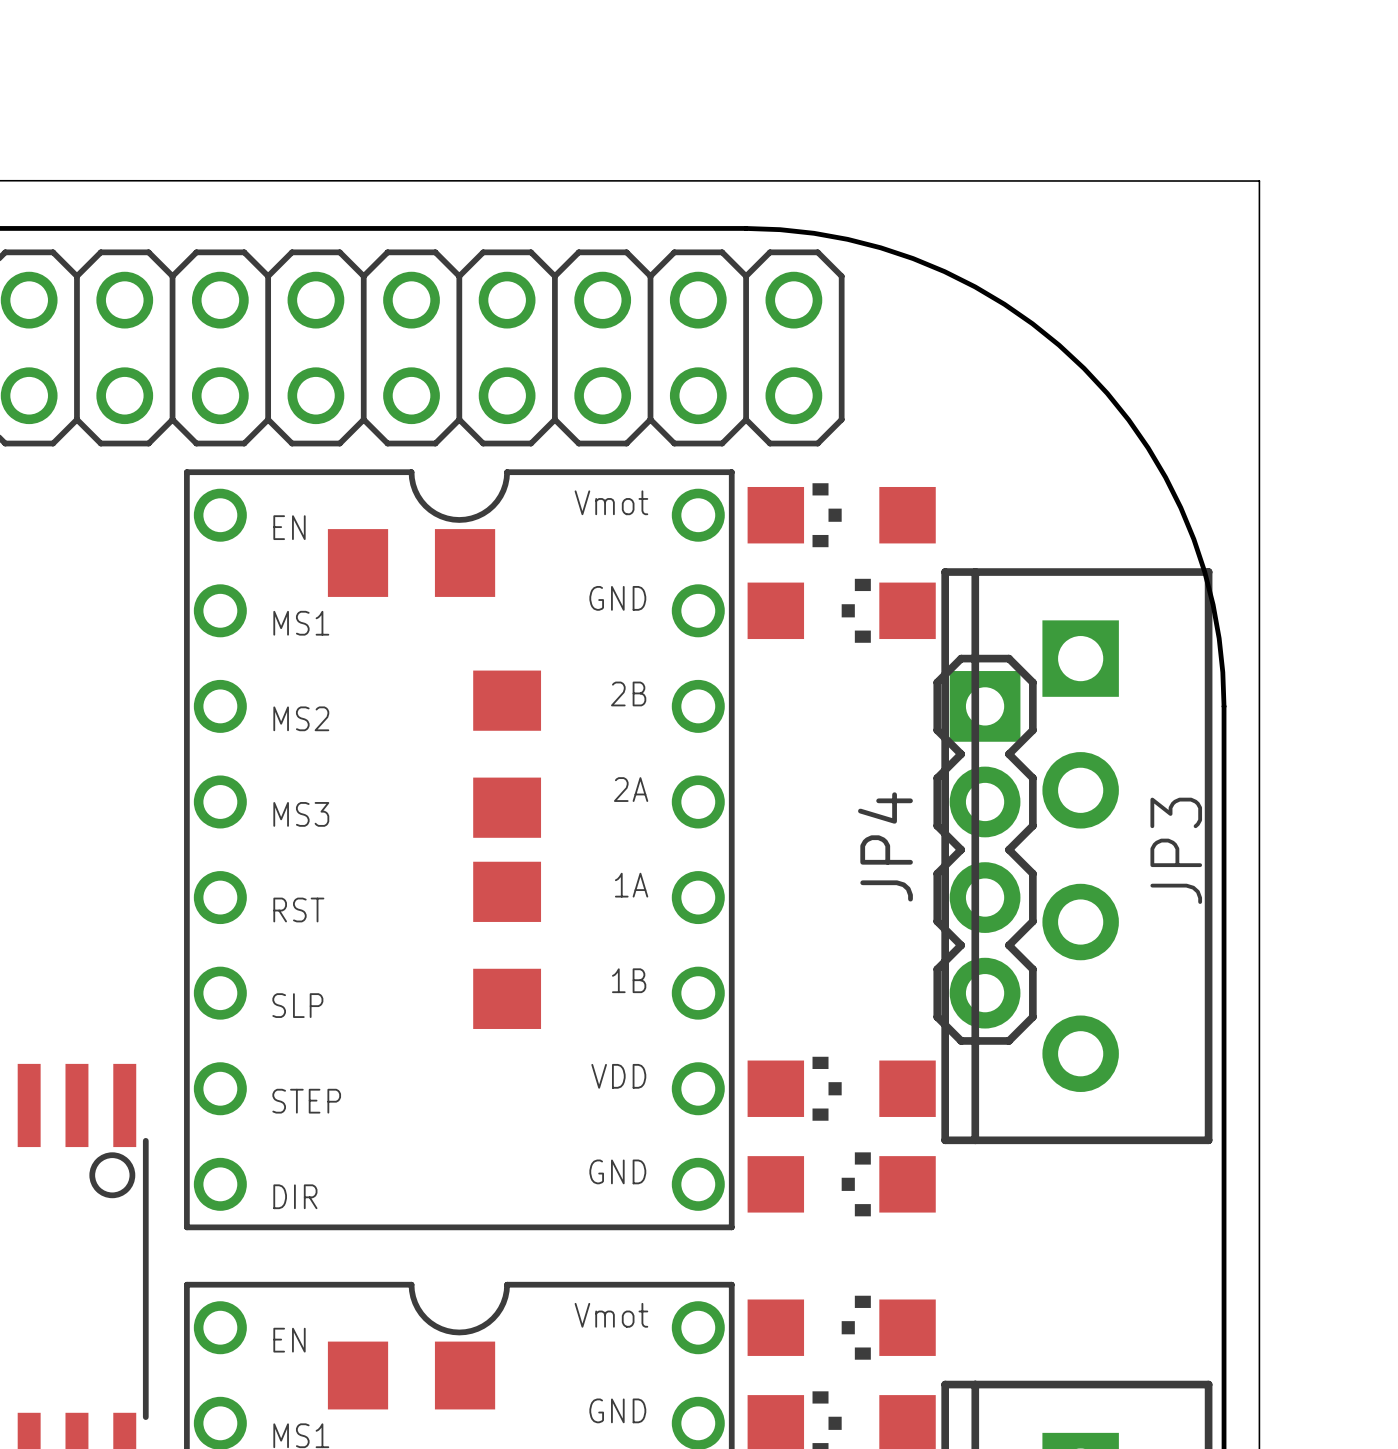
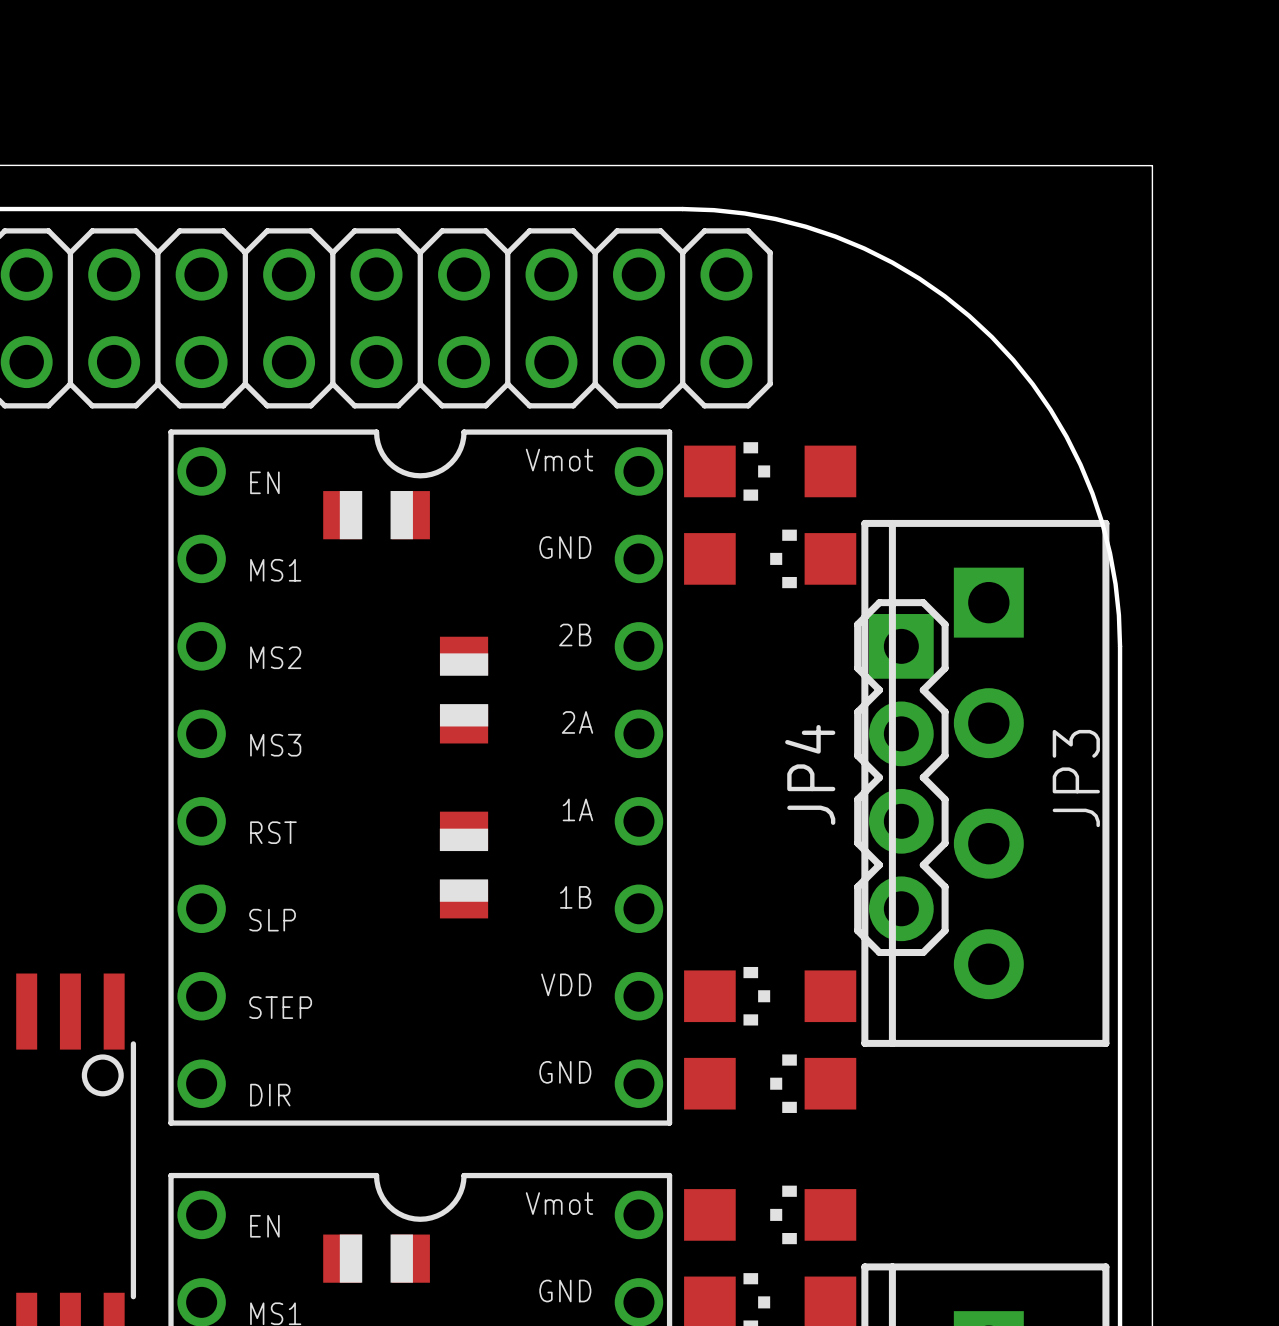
part footprint: [327, 529, 496, 597] -> [323, 491, 430, 540]
part footprint: [473, 670, 542, 838] -> [439, 636, 489, 744]
part footprint: [473, 861, 542, 1029] -> [439, 811, 489, 919]
part footprint: [327, 1341, 496, 1410] -> [323, 1234, 430, 1283]

